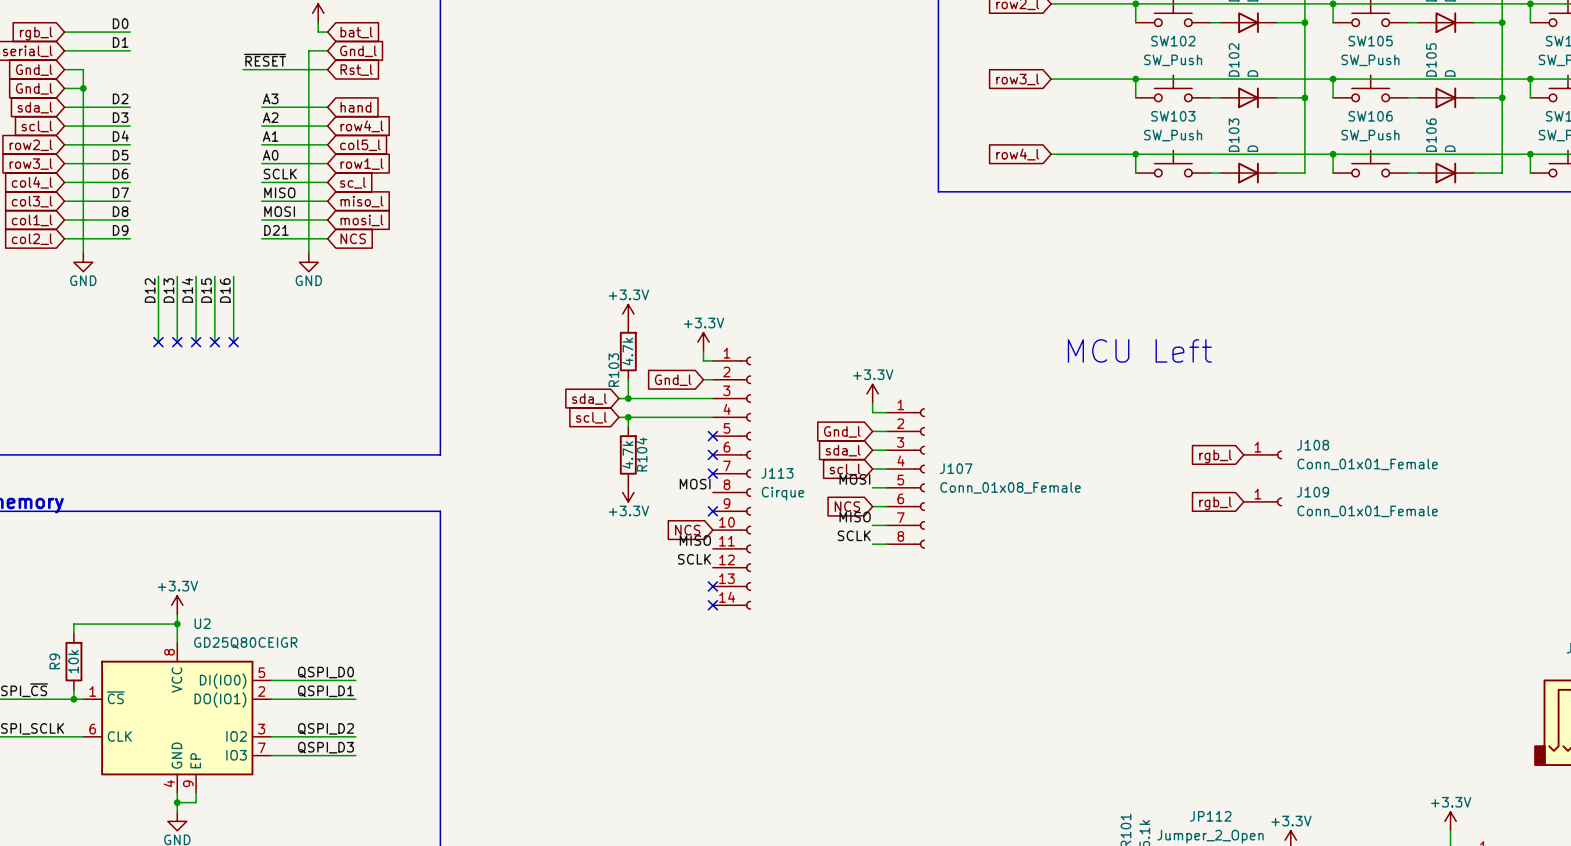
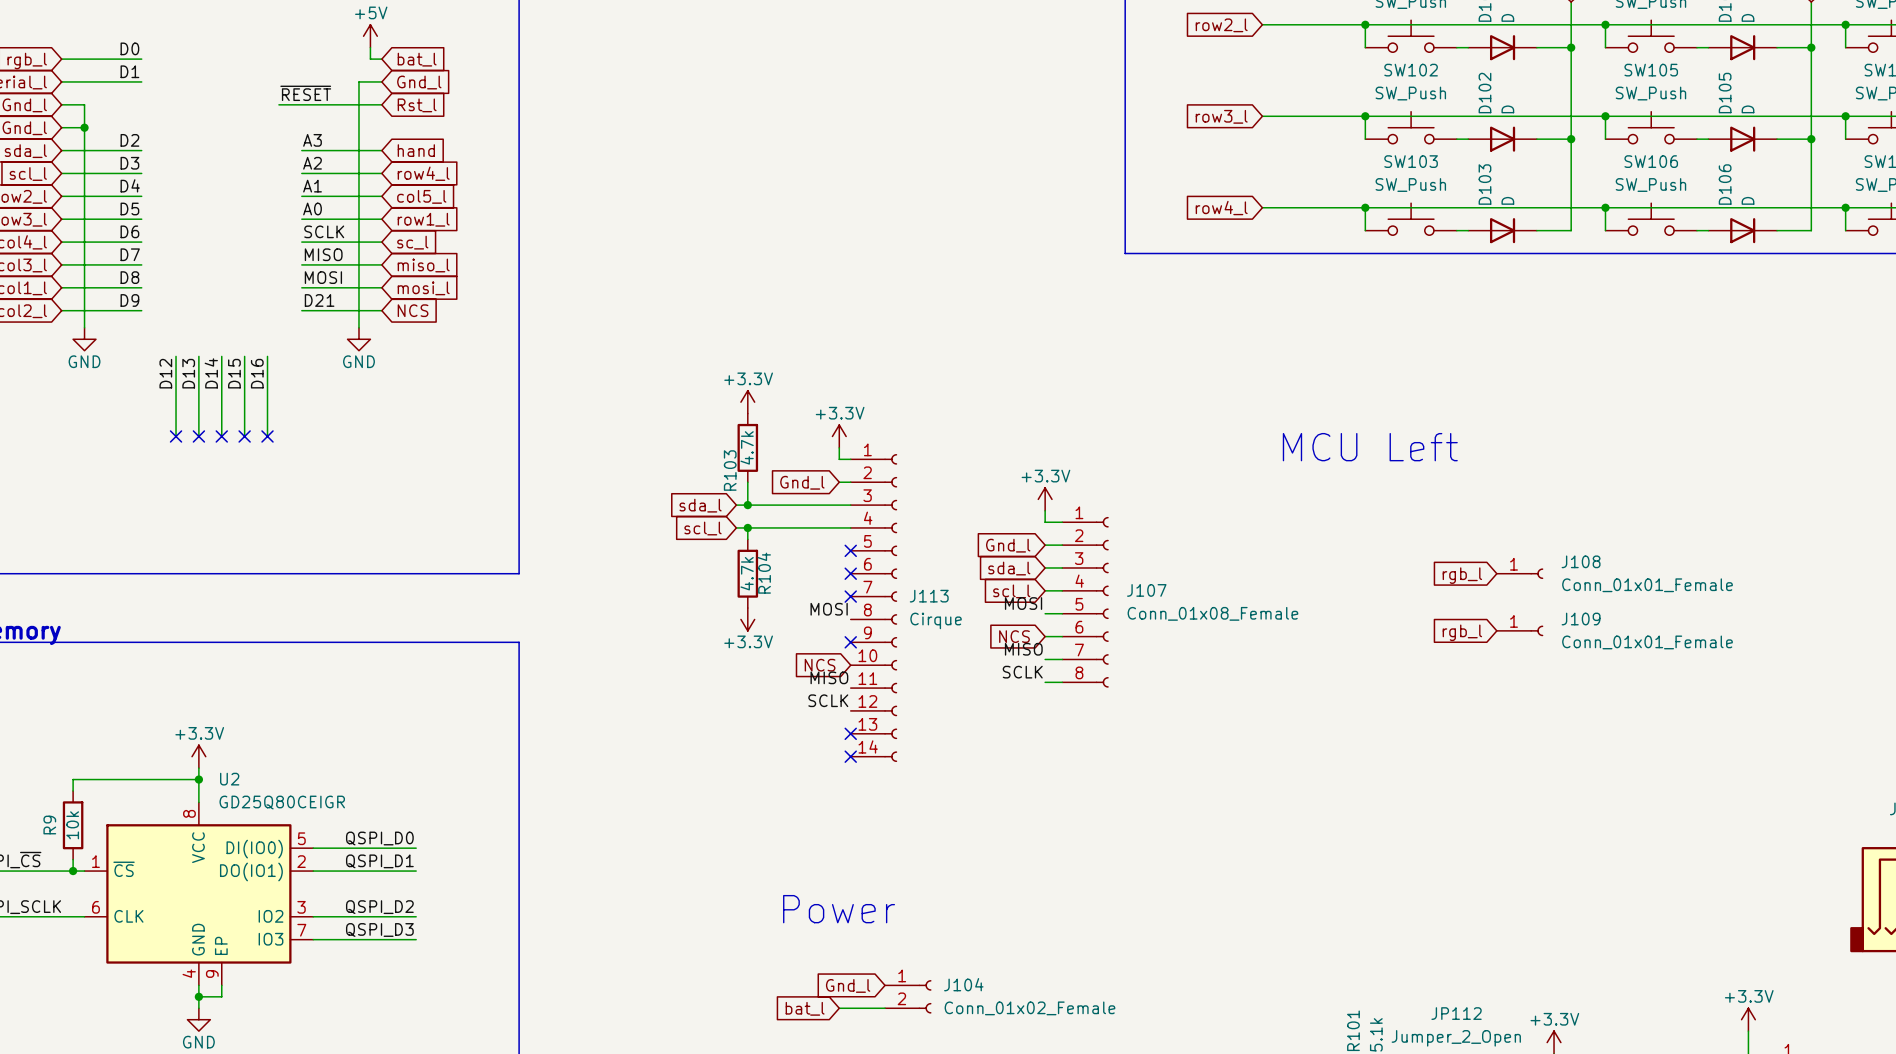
text: none -> Power (839, 909)
global label: none -> Gnd_l (848, 985)
J104: none -> Conn_01x02_Female (908, 996)
global label: none -> bat_l (805, 1008)
wire: none -> (839, 1008) (885, 1008)

